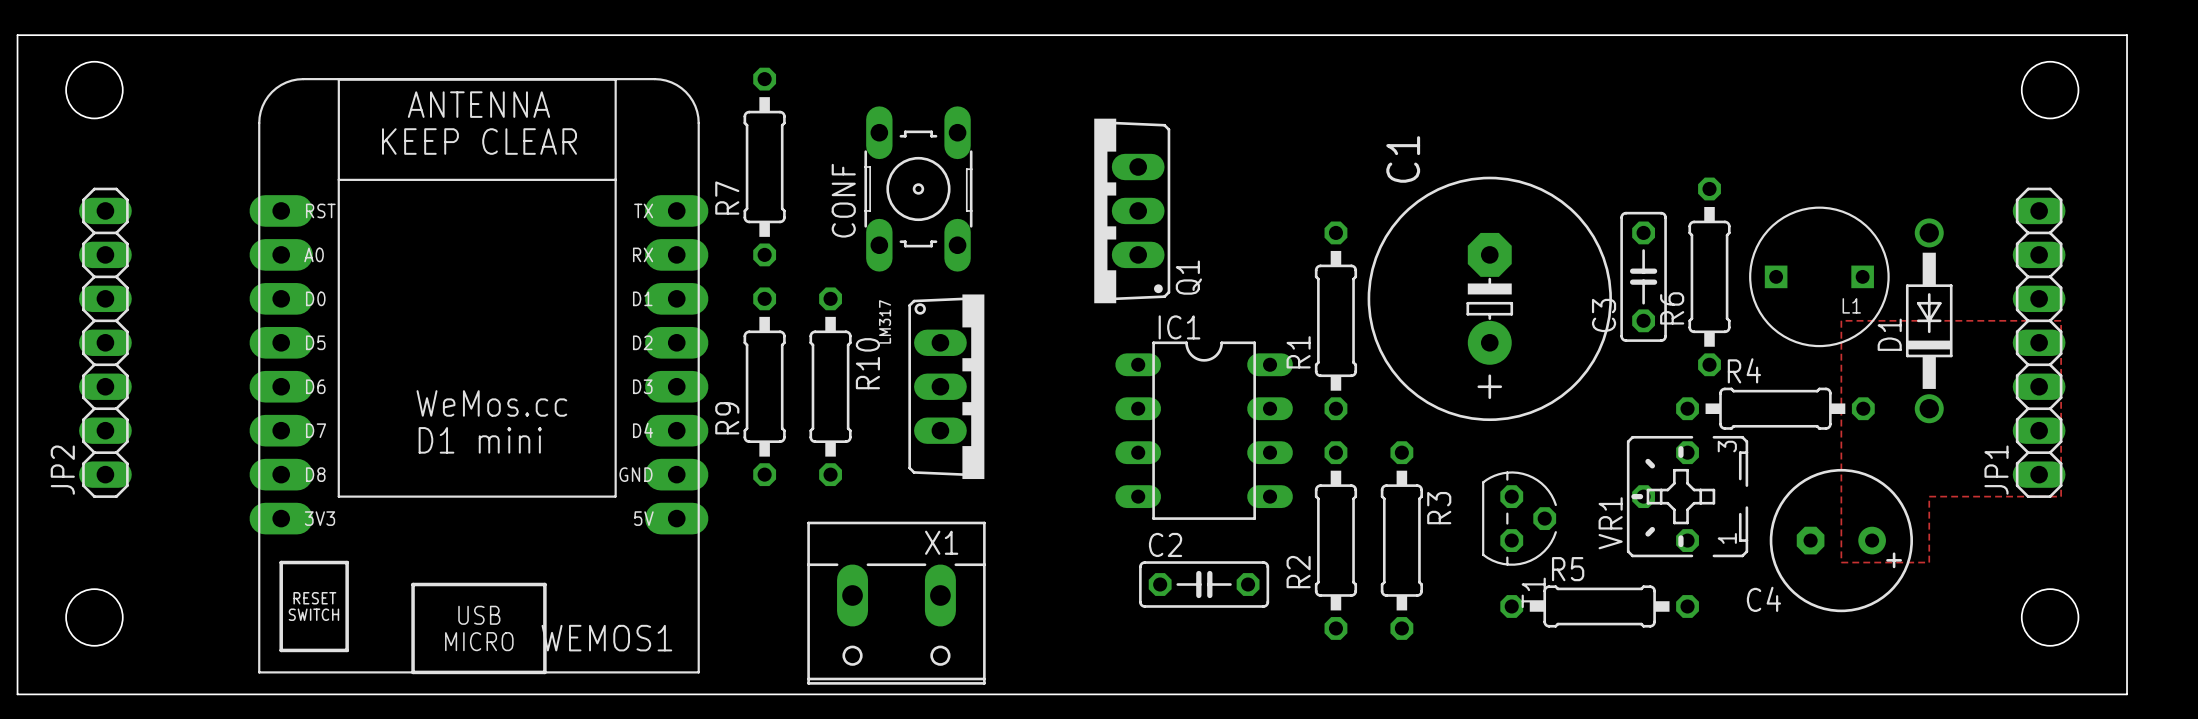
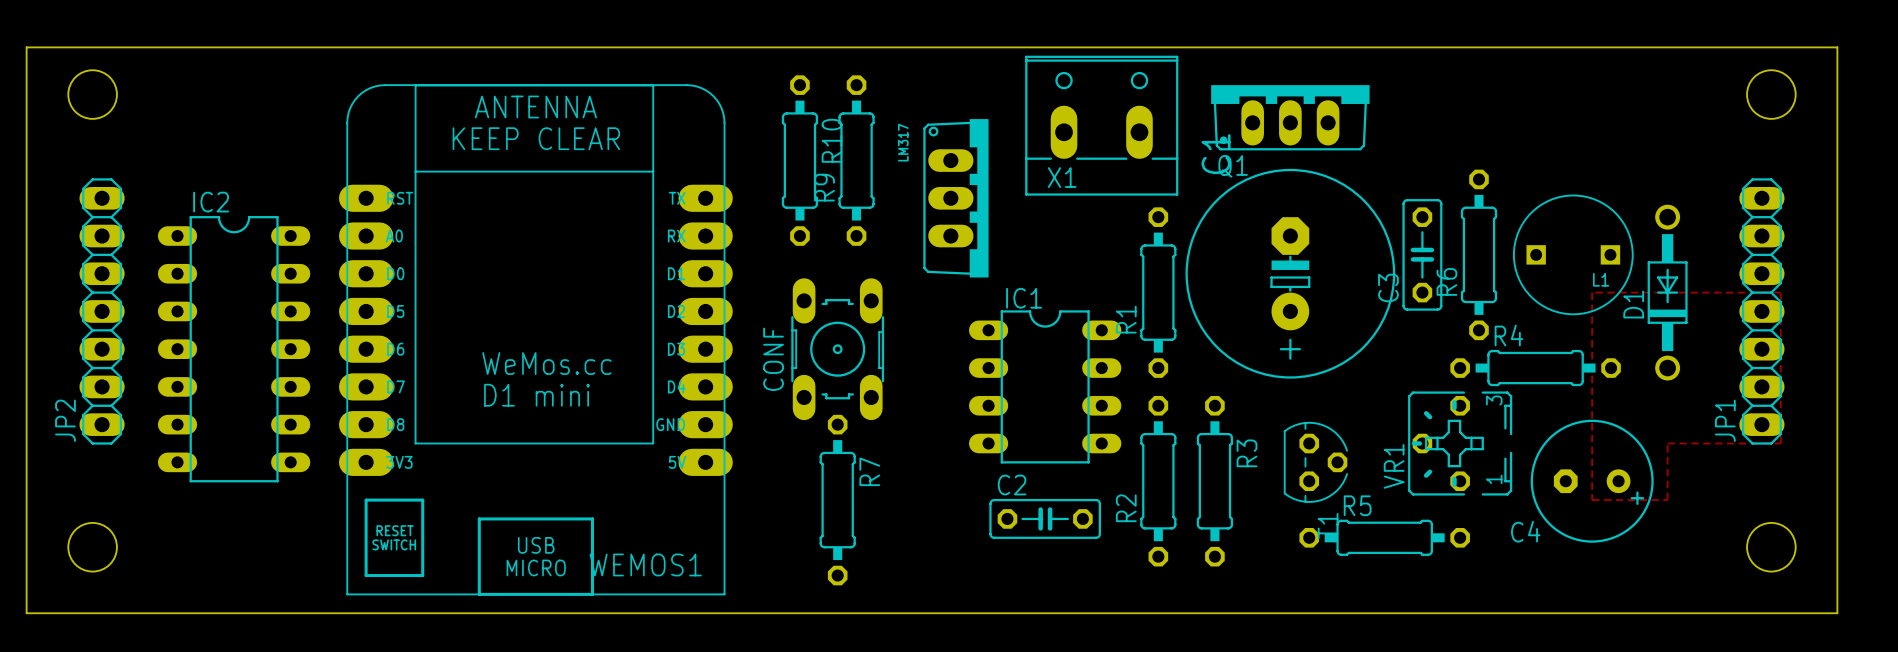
R7 position: (764, 167) -> (837, 500)
CONF position: (918, 188) -> (837, 349)
R7 name position: R7 (727, 198) -> R7 (869, 471)
Q1 rotation: 0° (1132, 210) -> 90° clockwise (1290, 117)
Q1 position: (1132, 210) -> (1290, 117)
WEMOS1 position: (478, 376) -> (535, 340)
IC2: none -> (234, 349)
R9 position: (764, 386) -> (856, 160)
R10 position: (830, 386) -> (799, 160)
part position: (946, 386) -> (955, 198)
X1 rotation: 0° (896, 603) -> 180° (1101, 125)
X1 position: (896, 603) -> (1101, 125)

